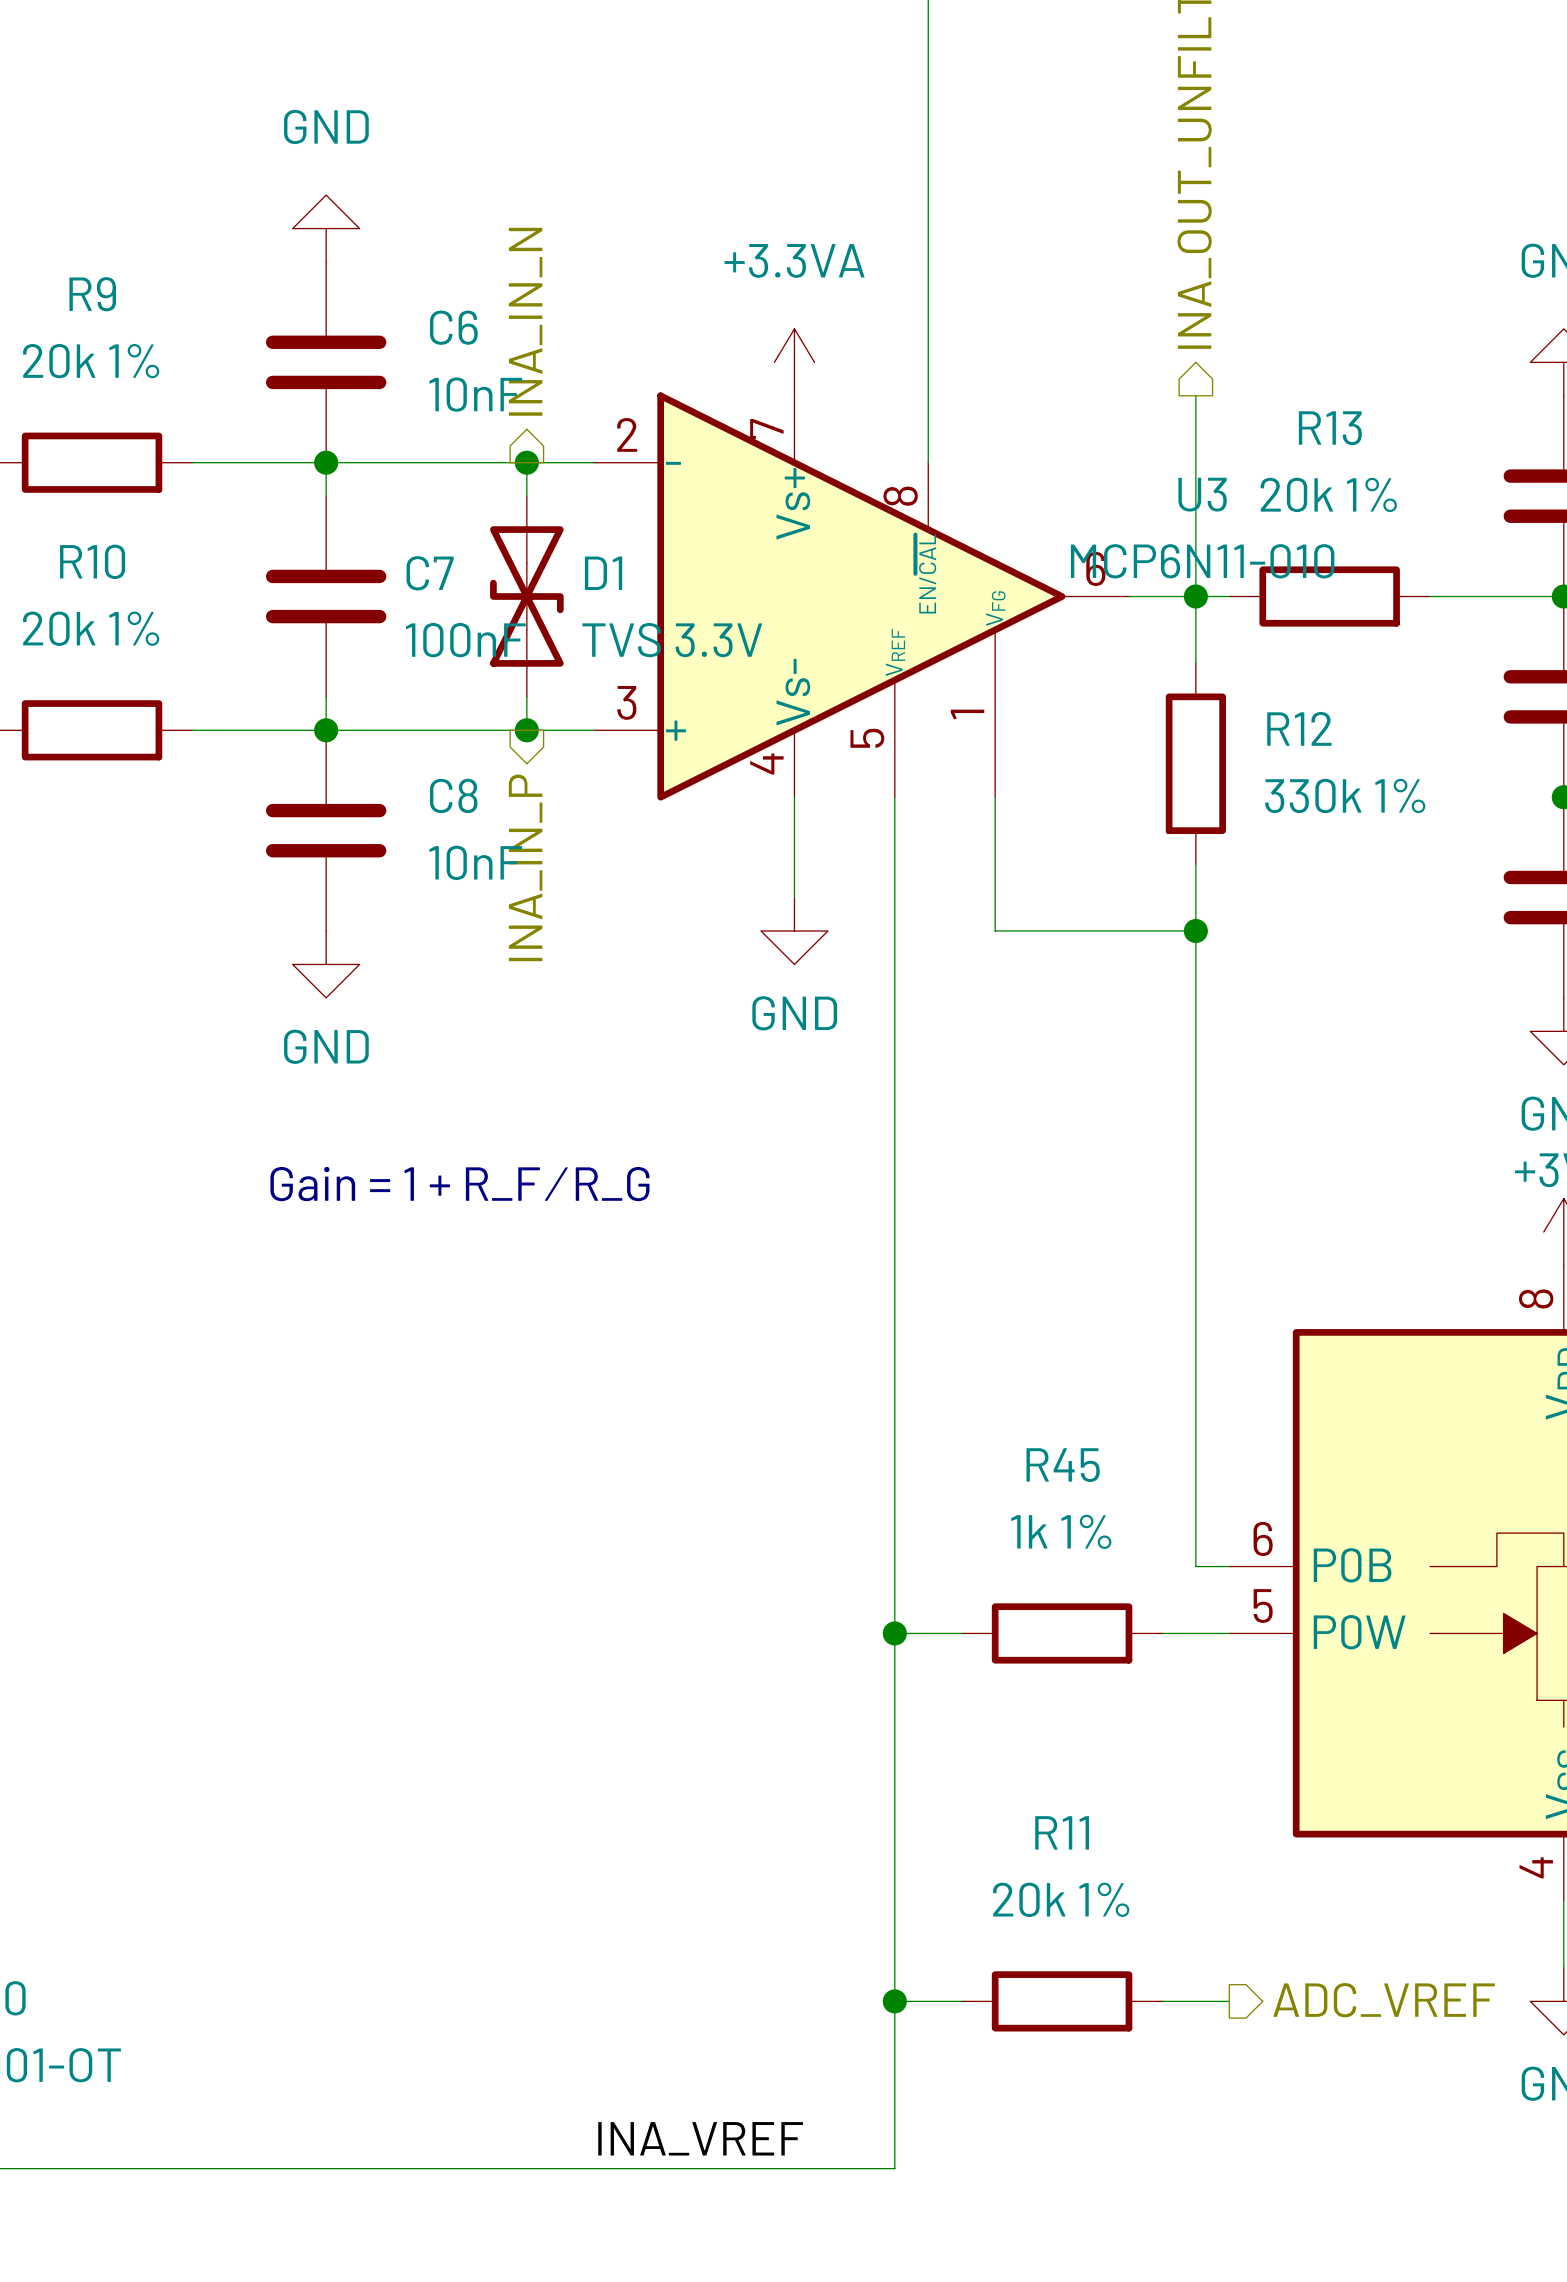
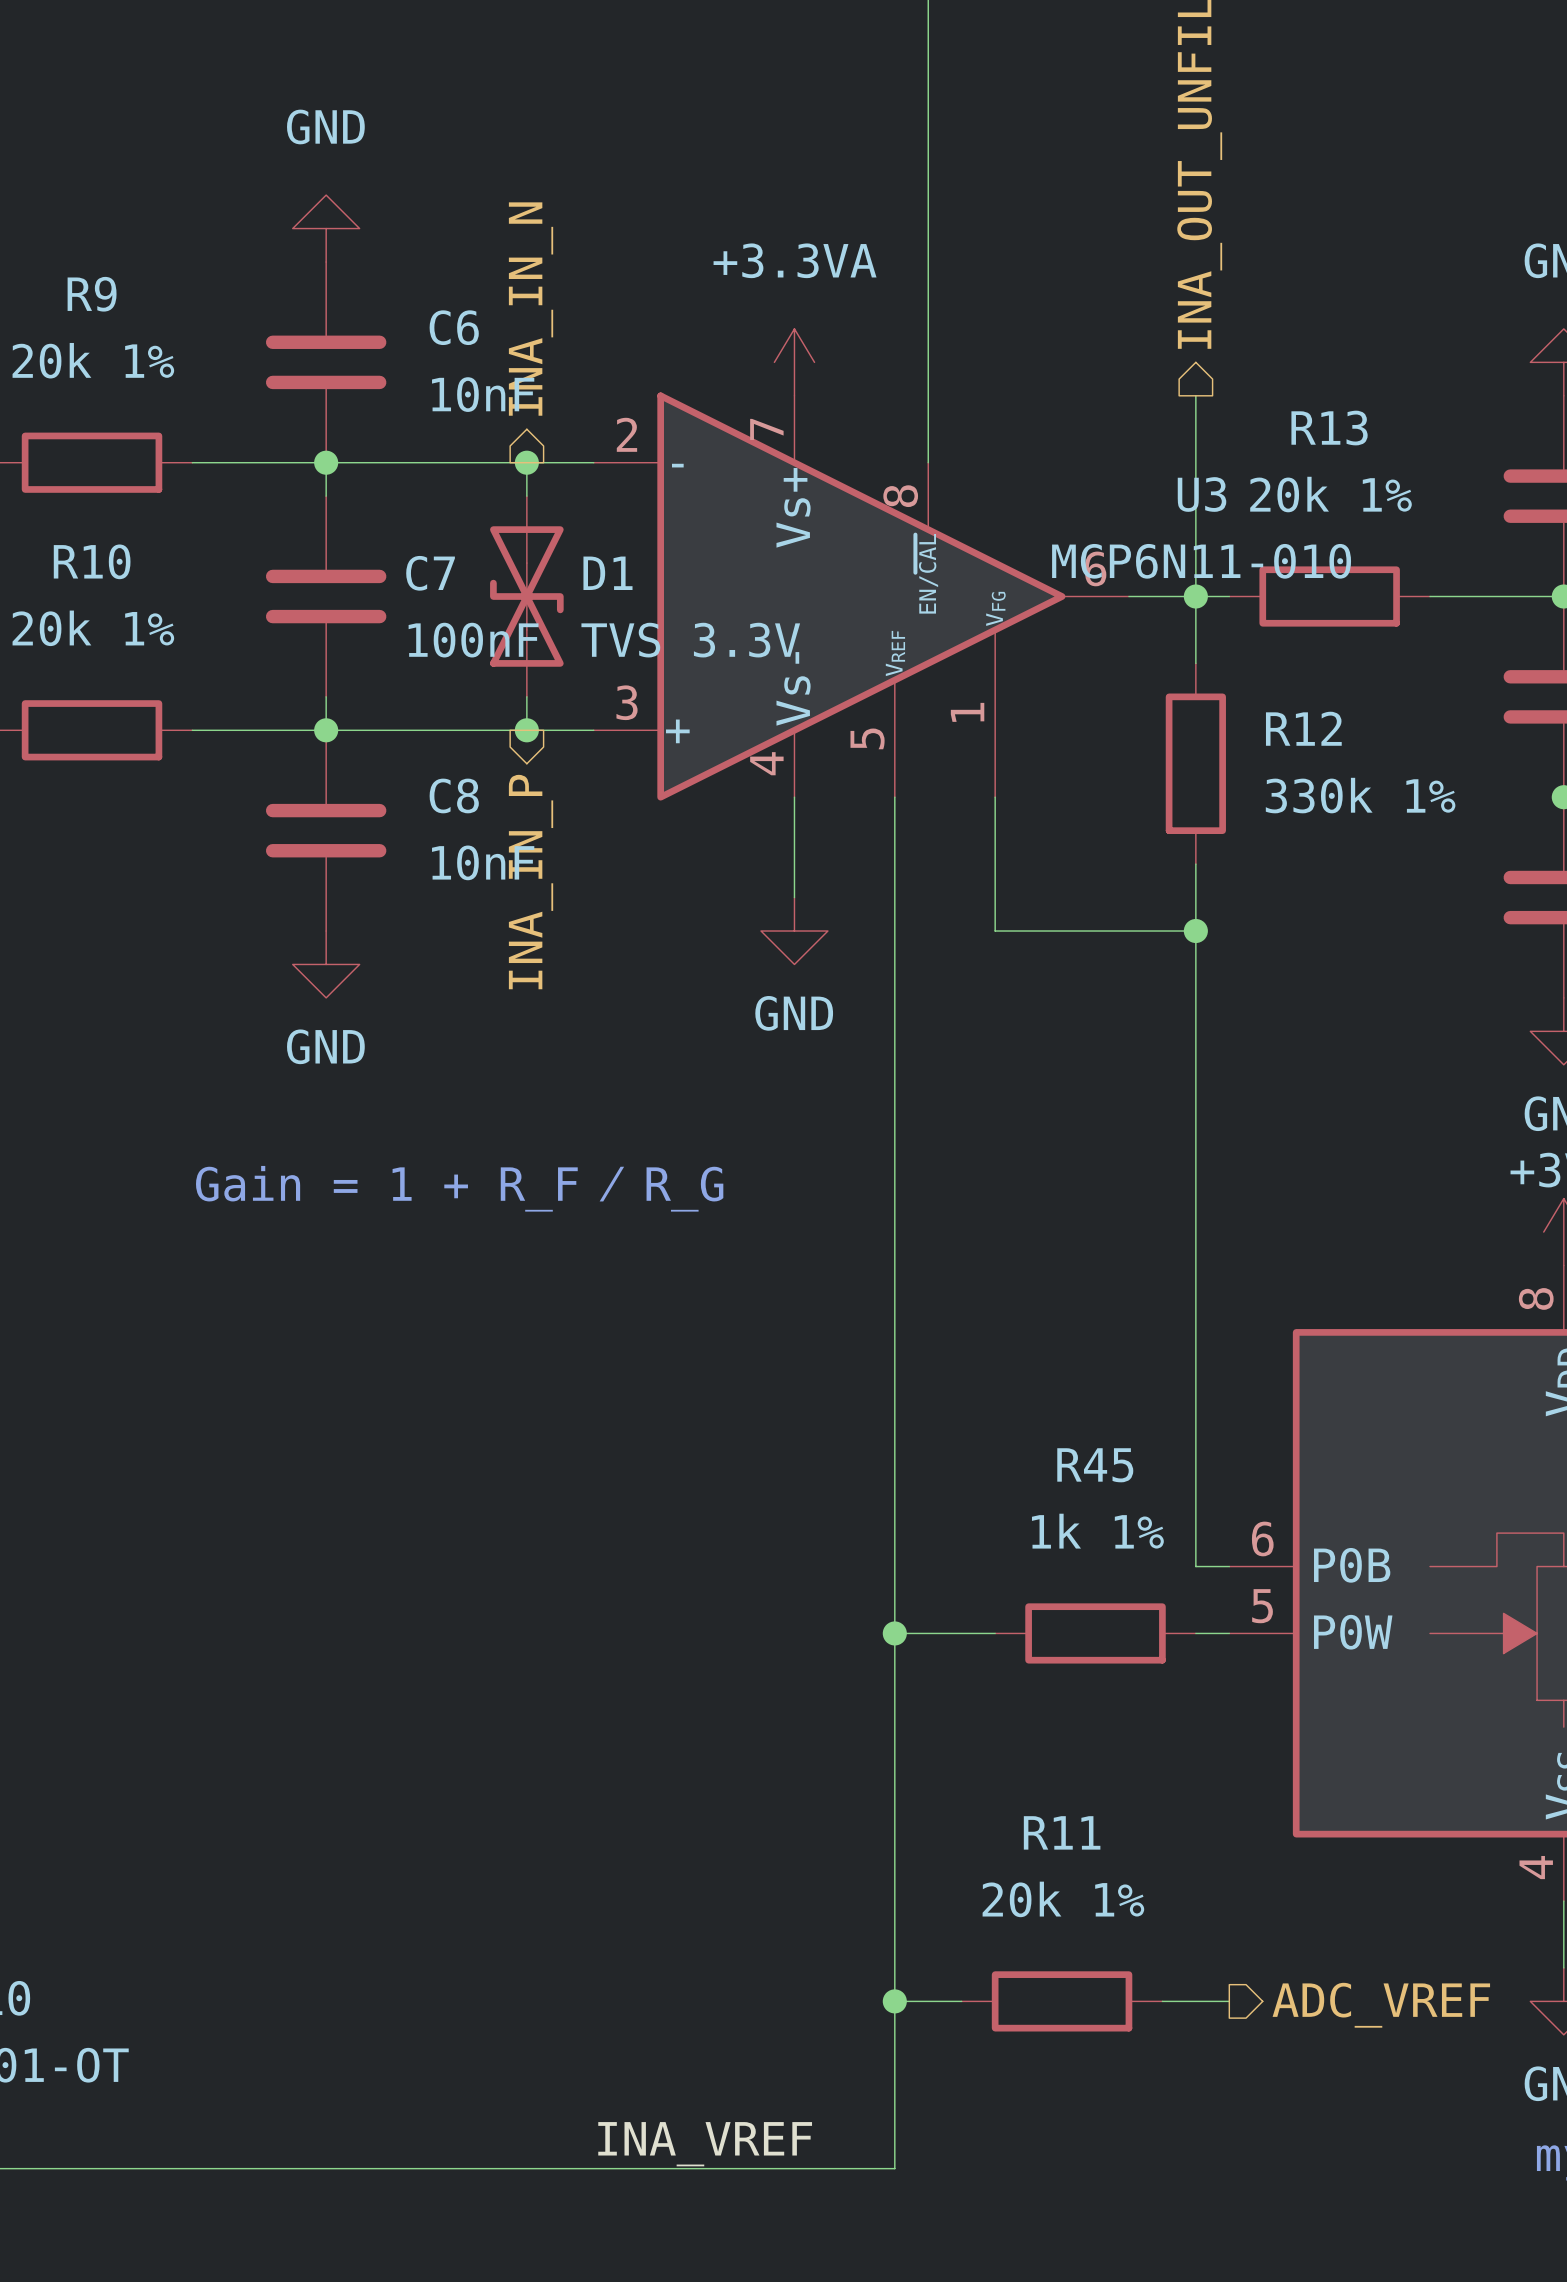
R45 position: (1062, 1633) -> (1095, 1633)

